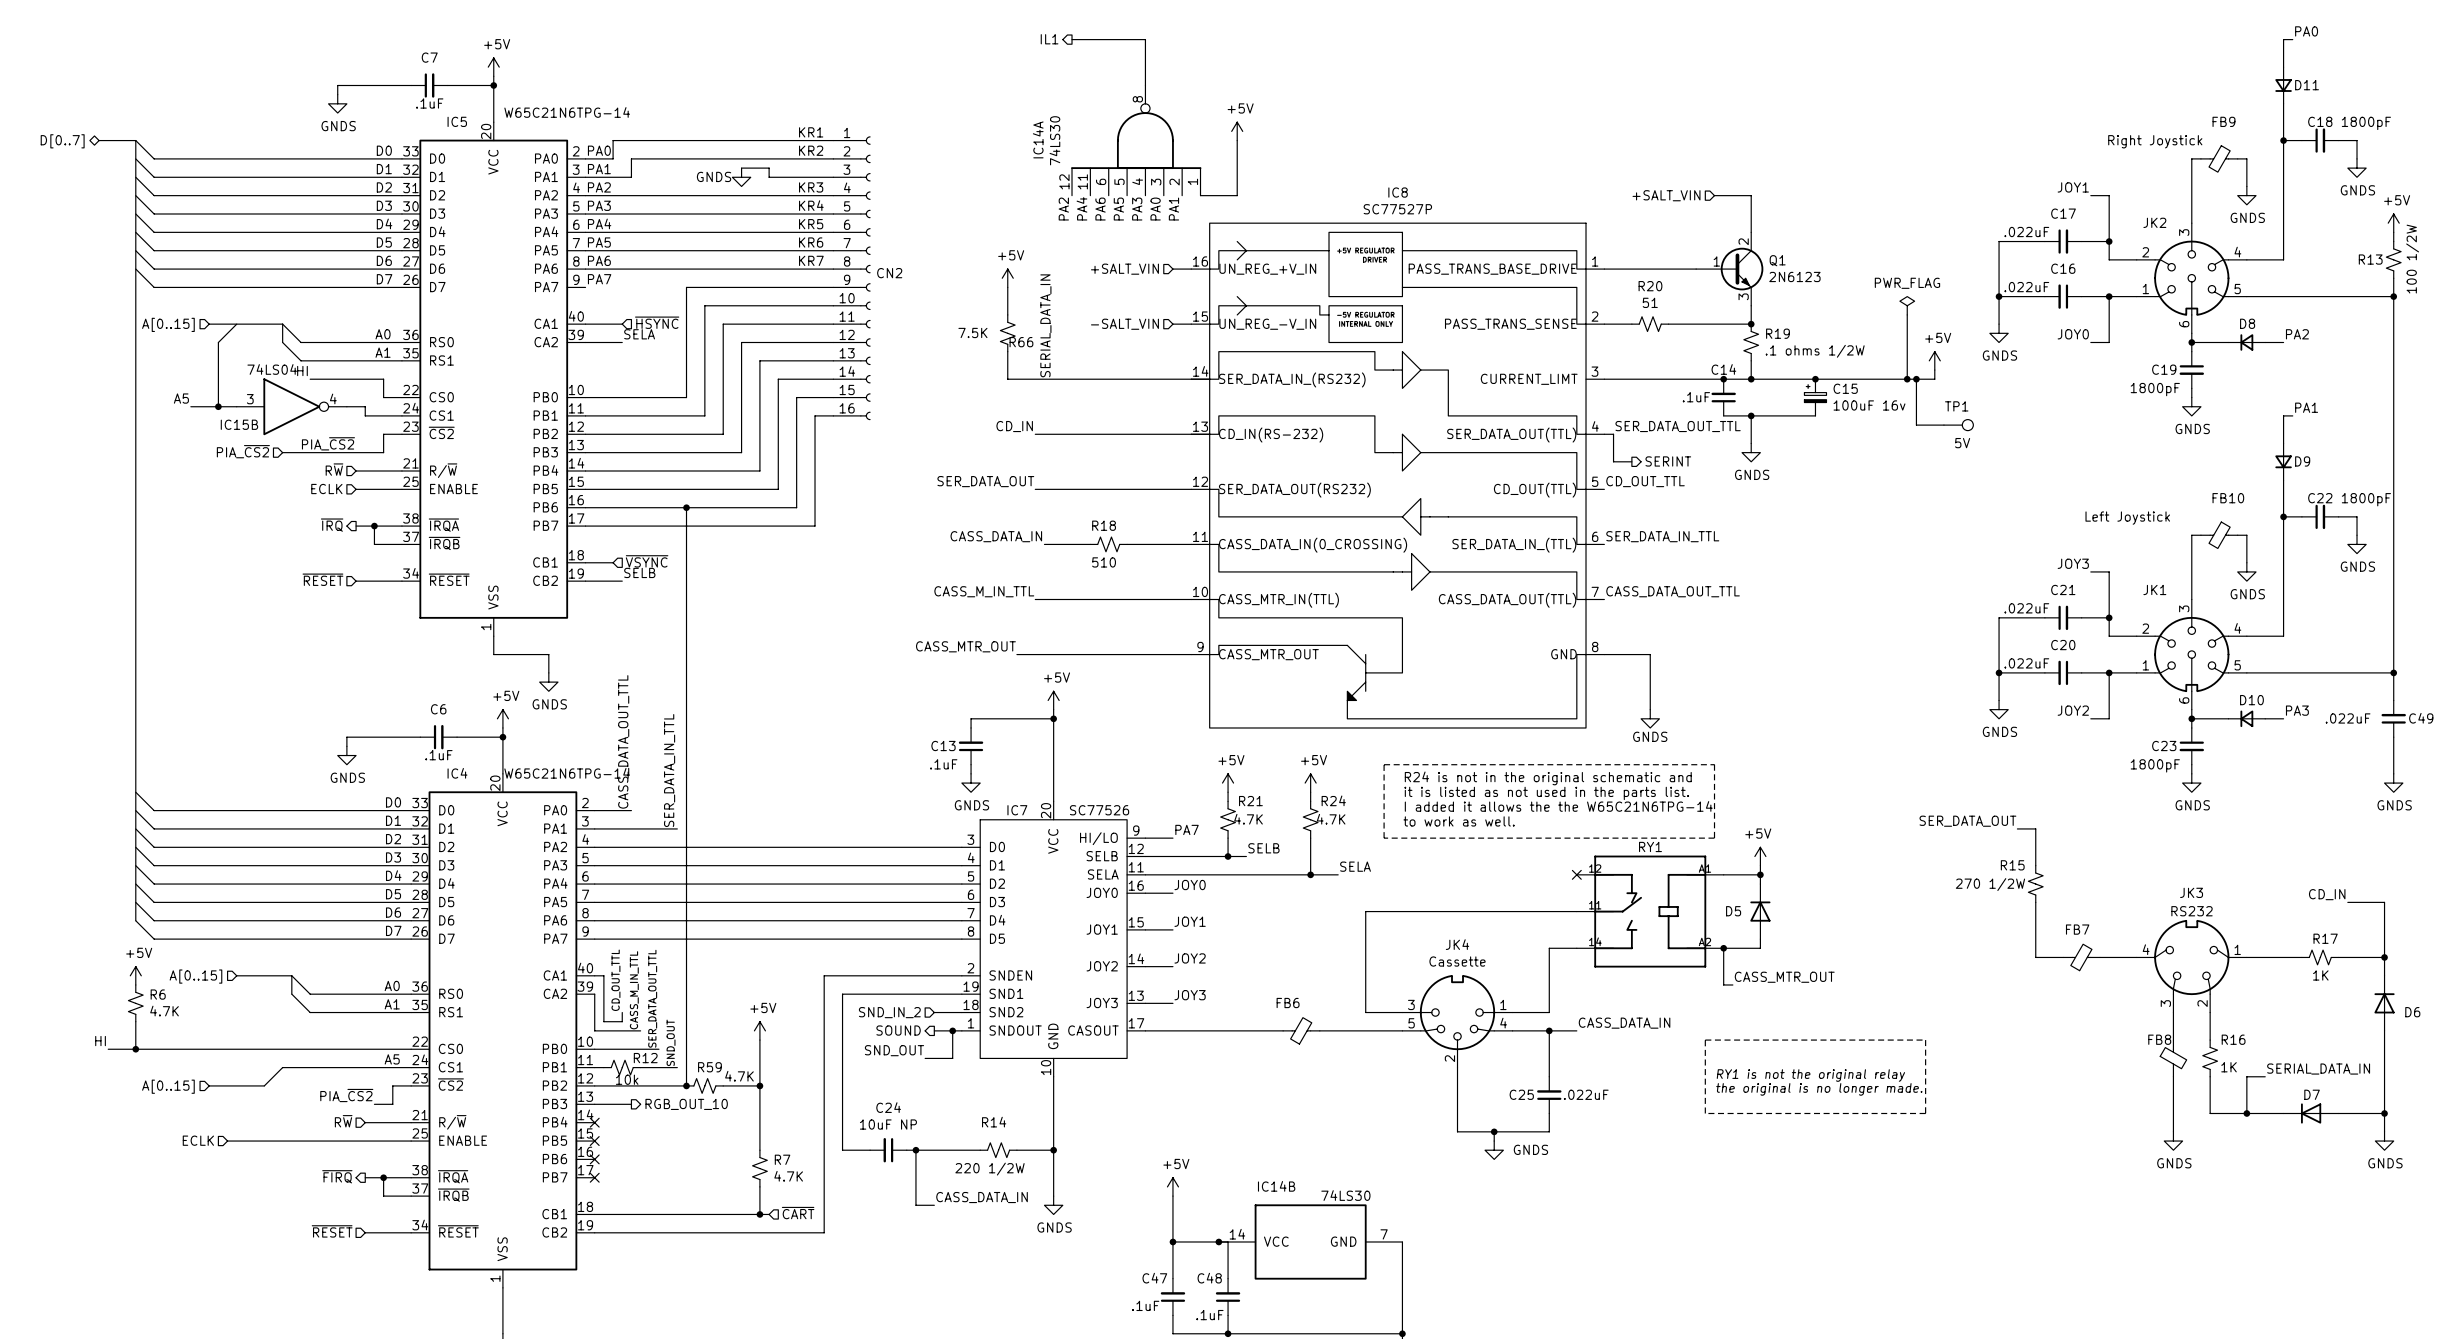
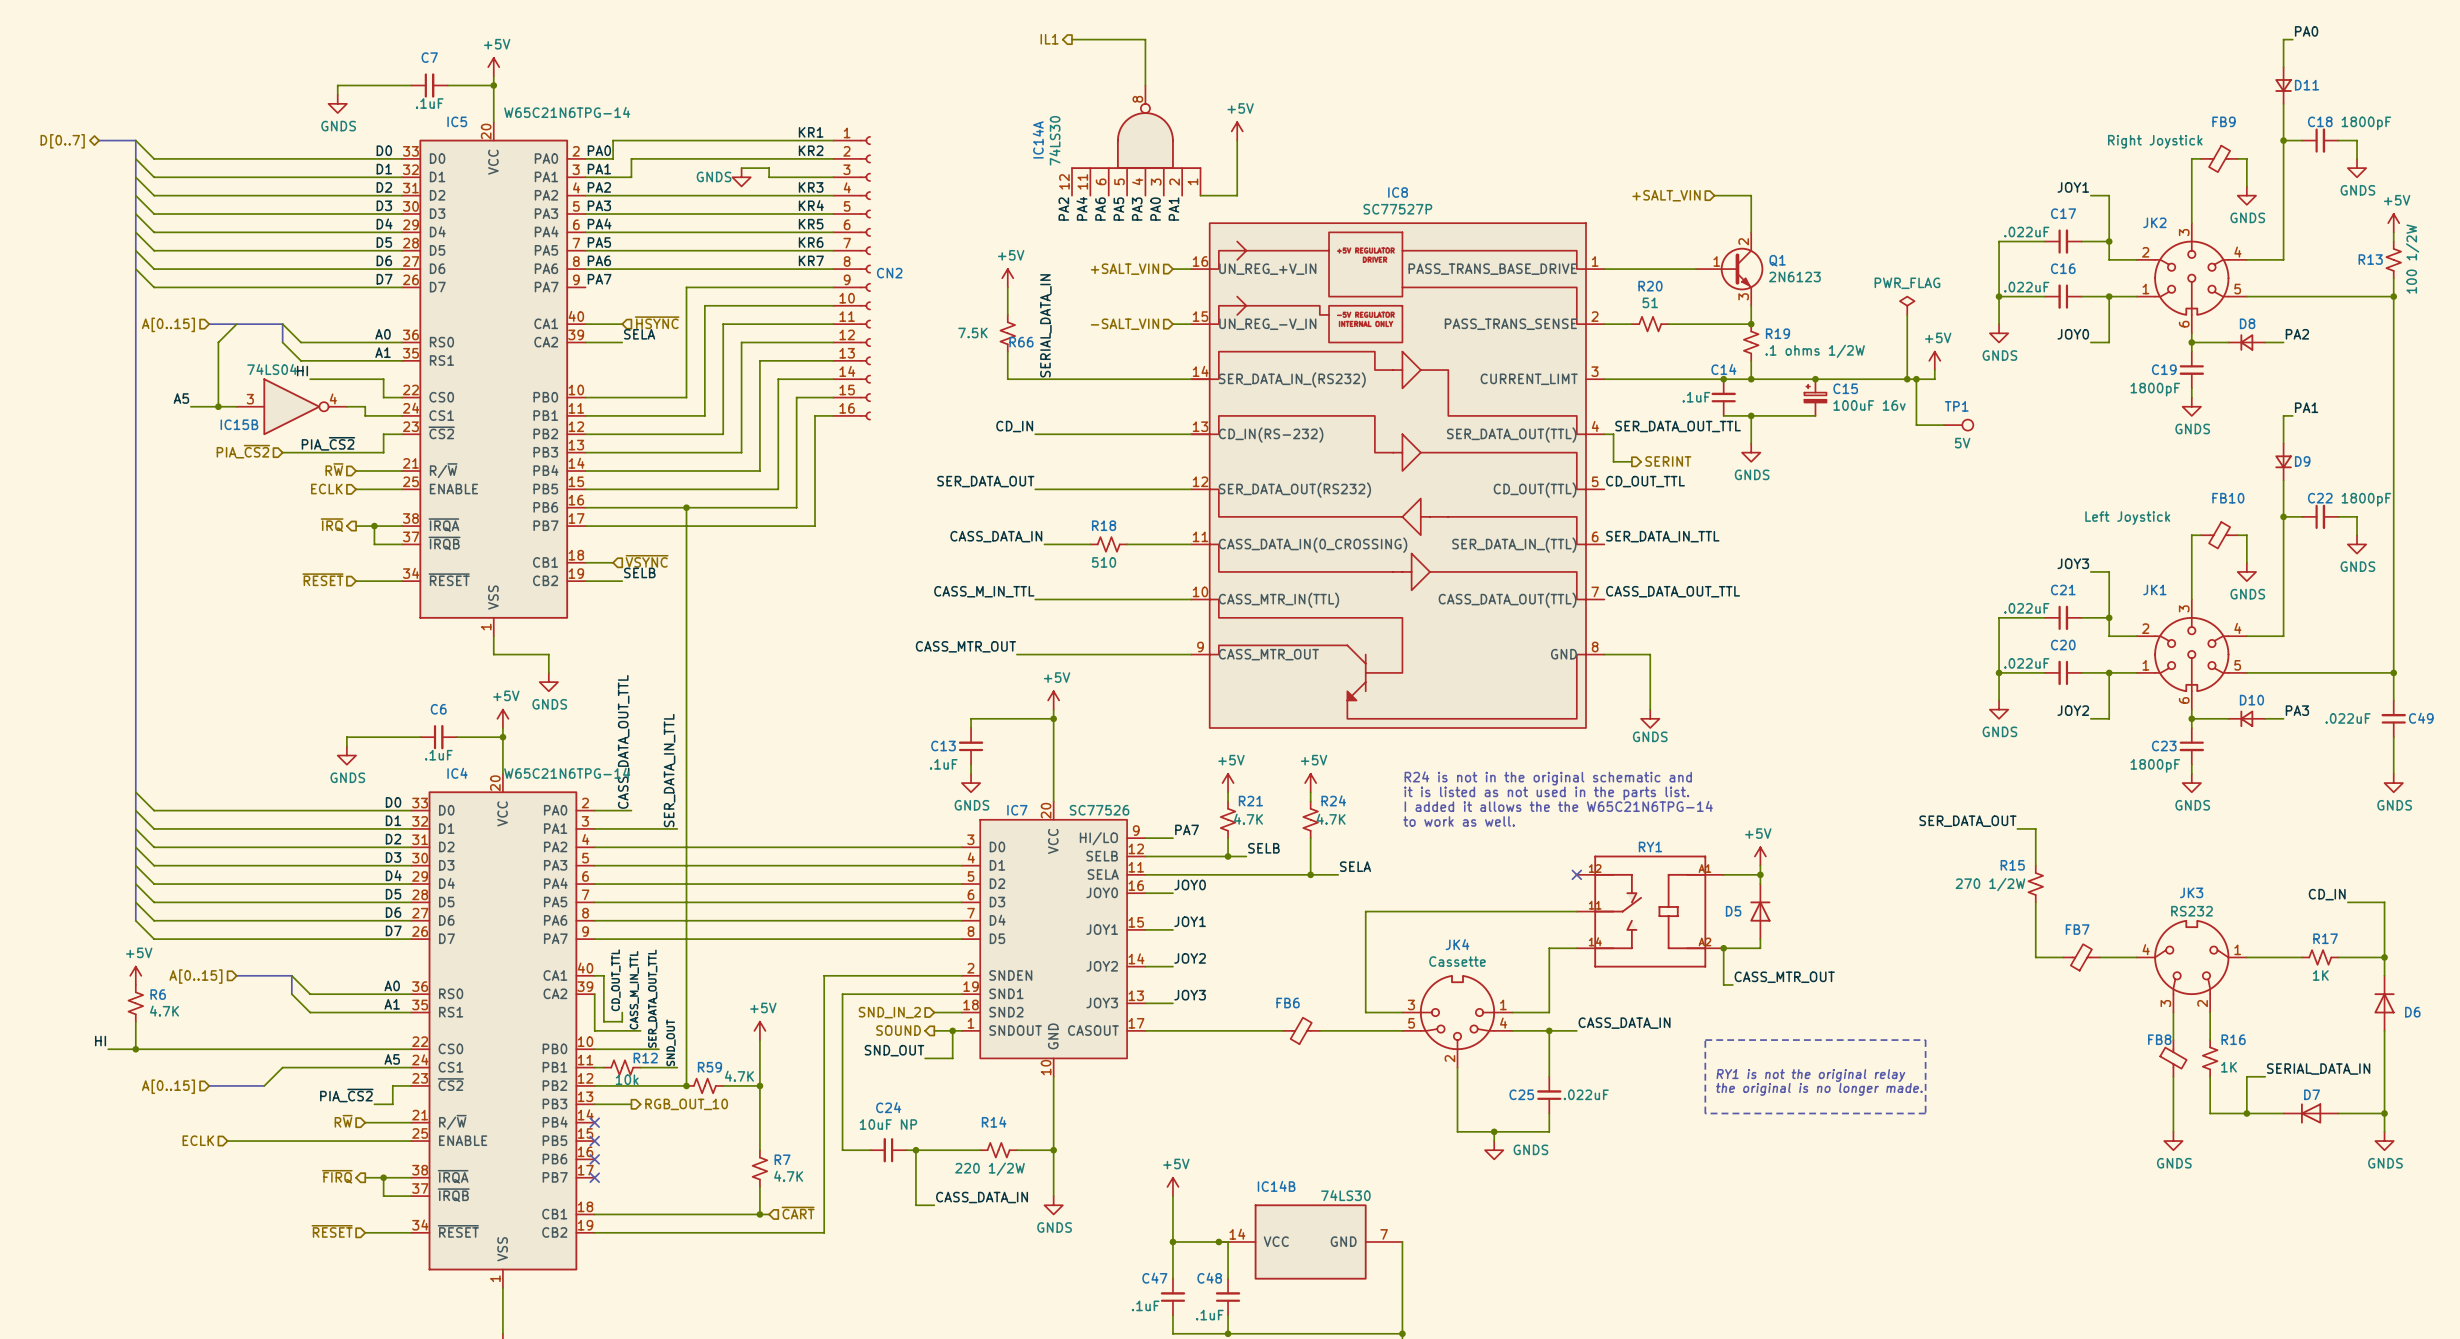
line: (1384, 764) (1384, 838) (1714, 838) (1714, 764) (1384, 764) -> none

